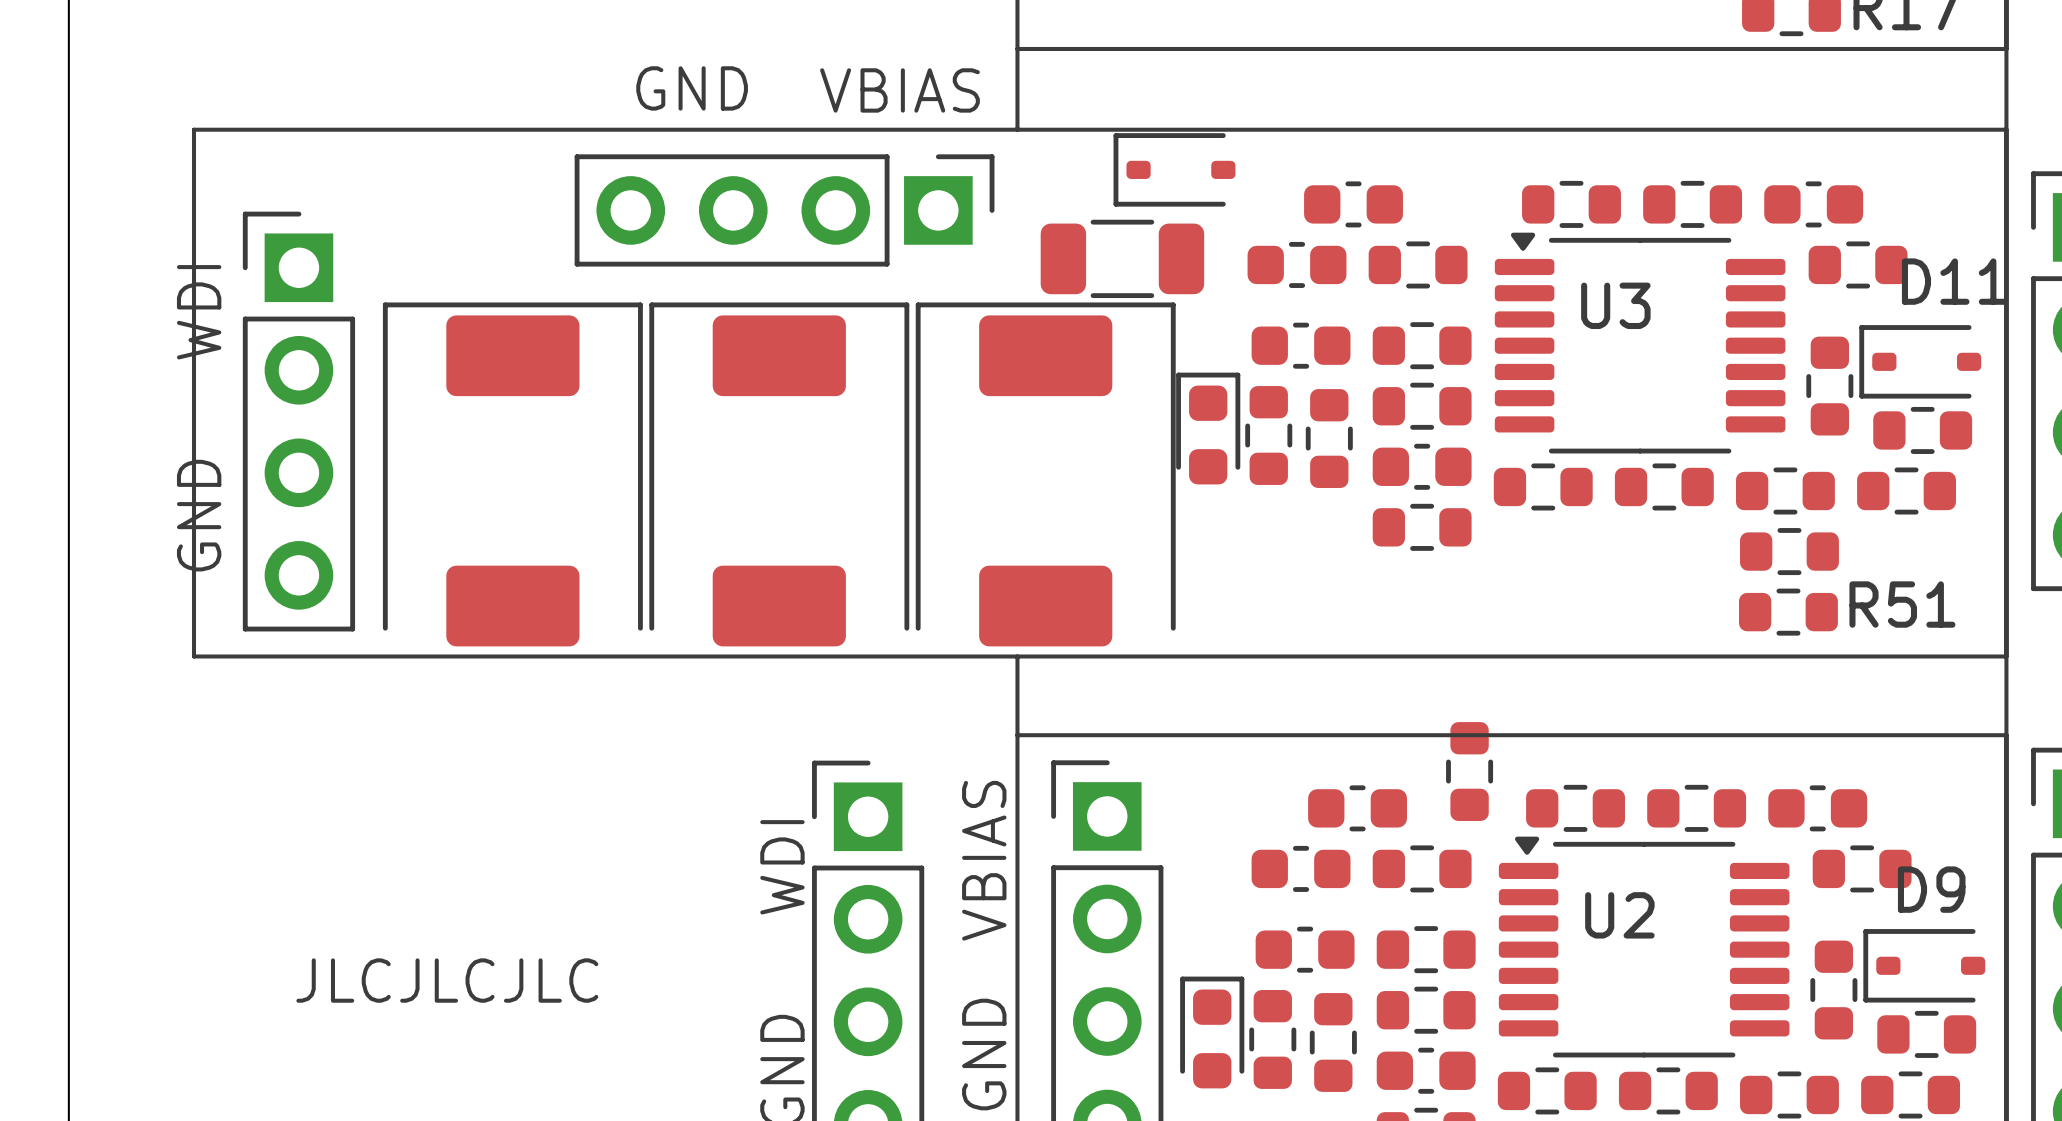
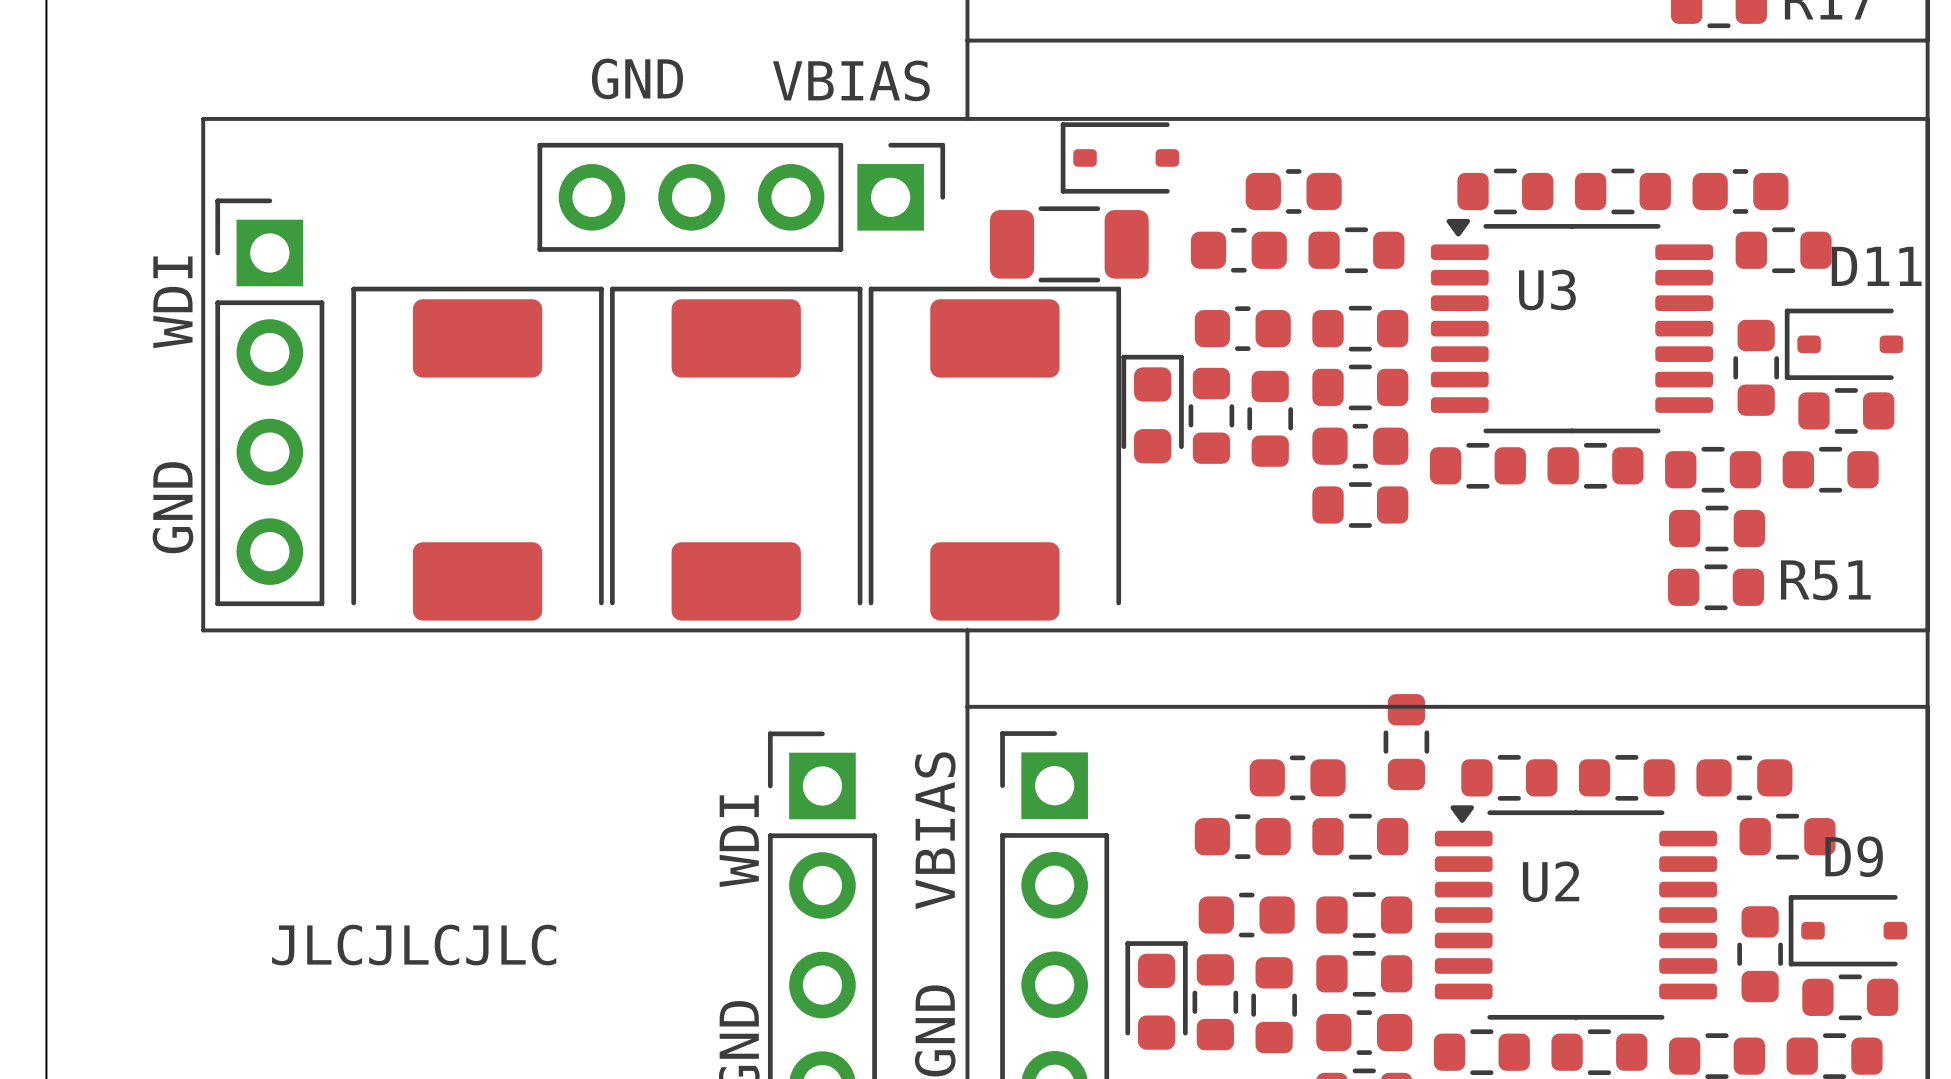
line: (230, 129) (193, 129) (193, 656) (230, 656) -> (203, 118) (203, 630)

